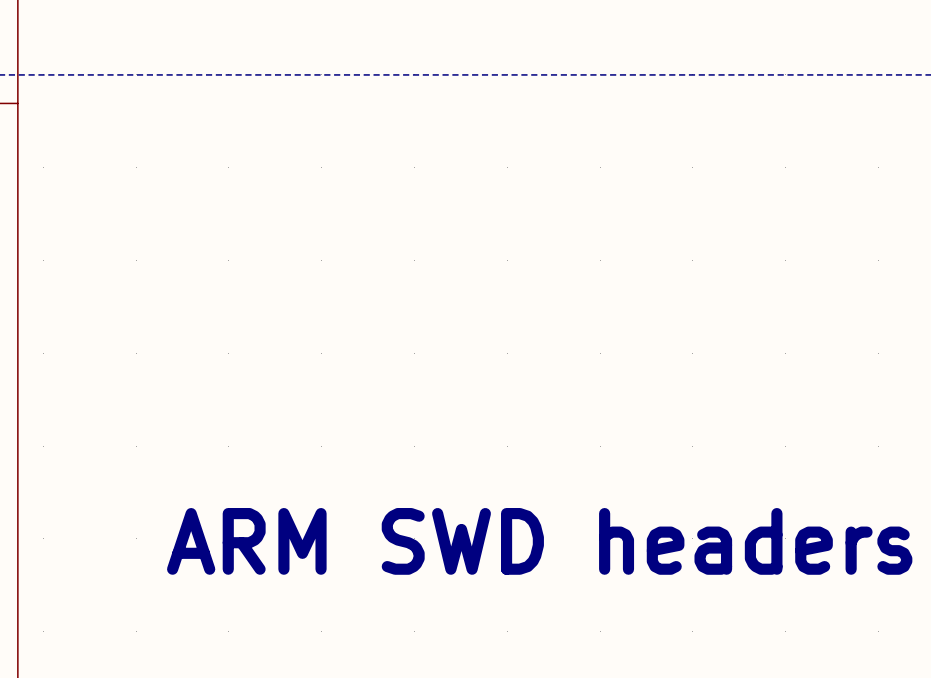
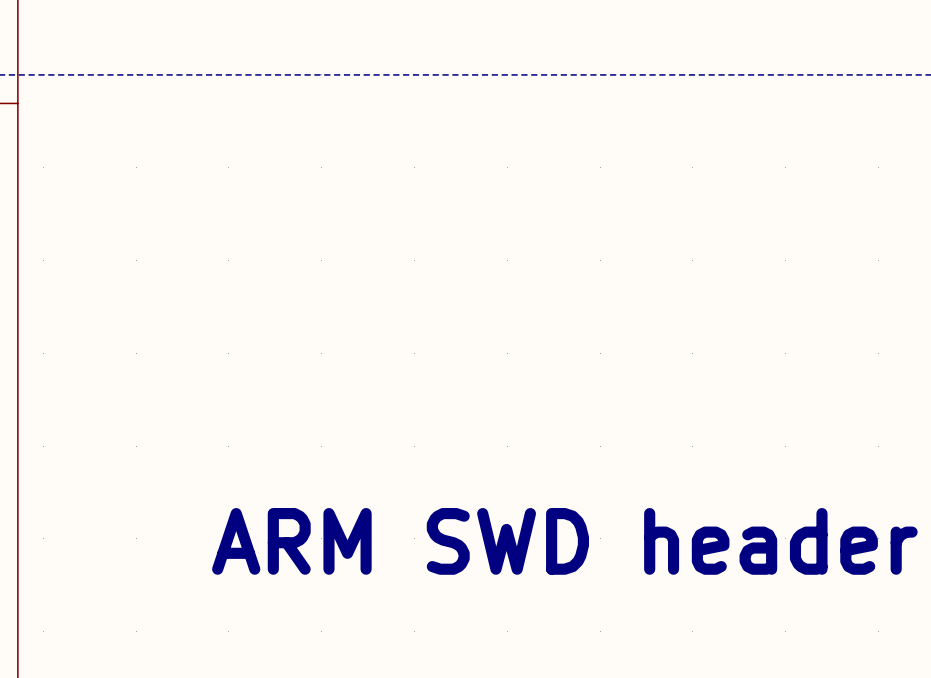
text: ARM SWD headers (539, 541) -> ARM SWD header (564, 541)

